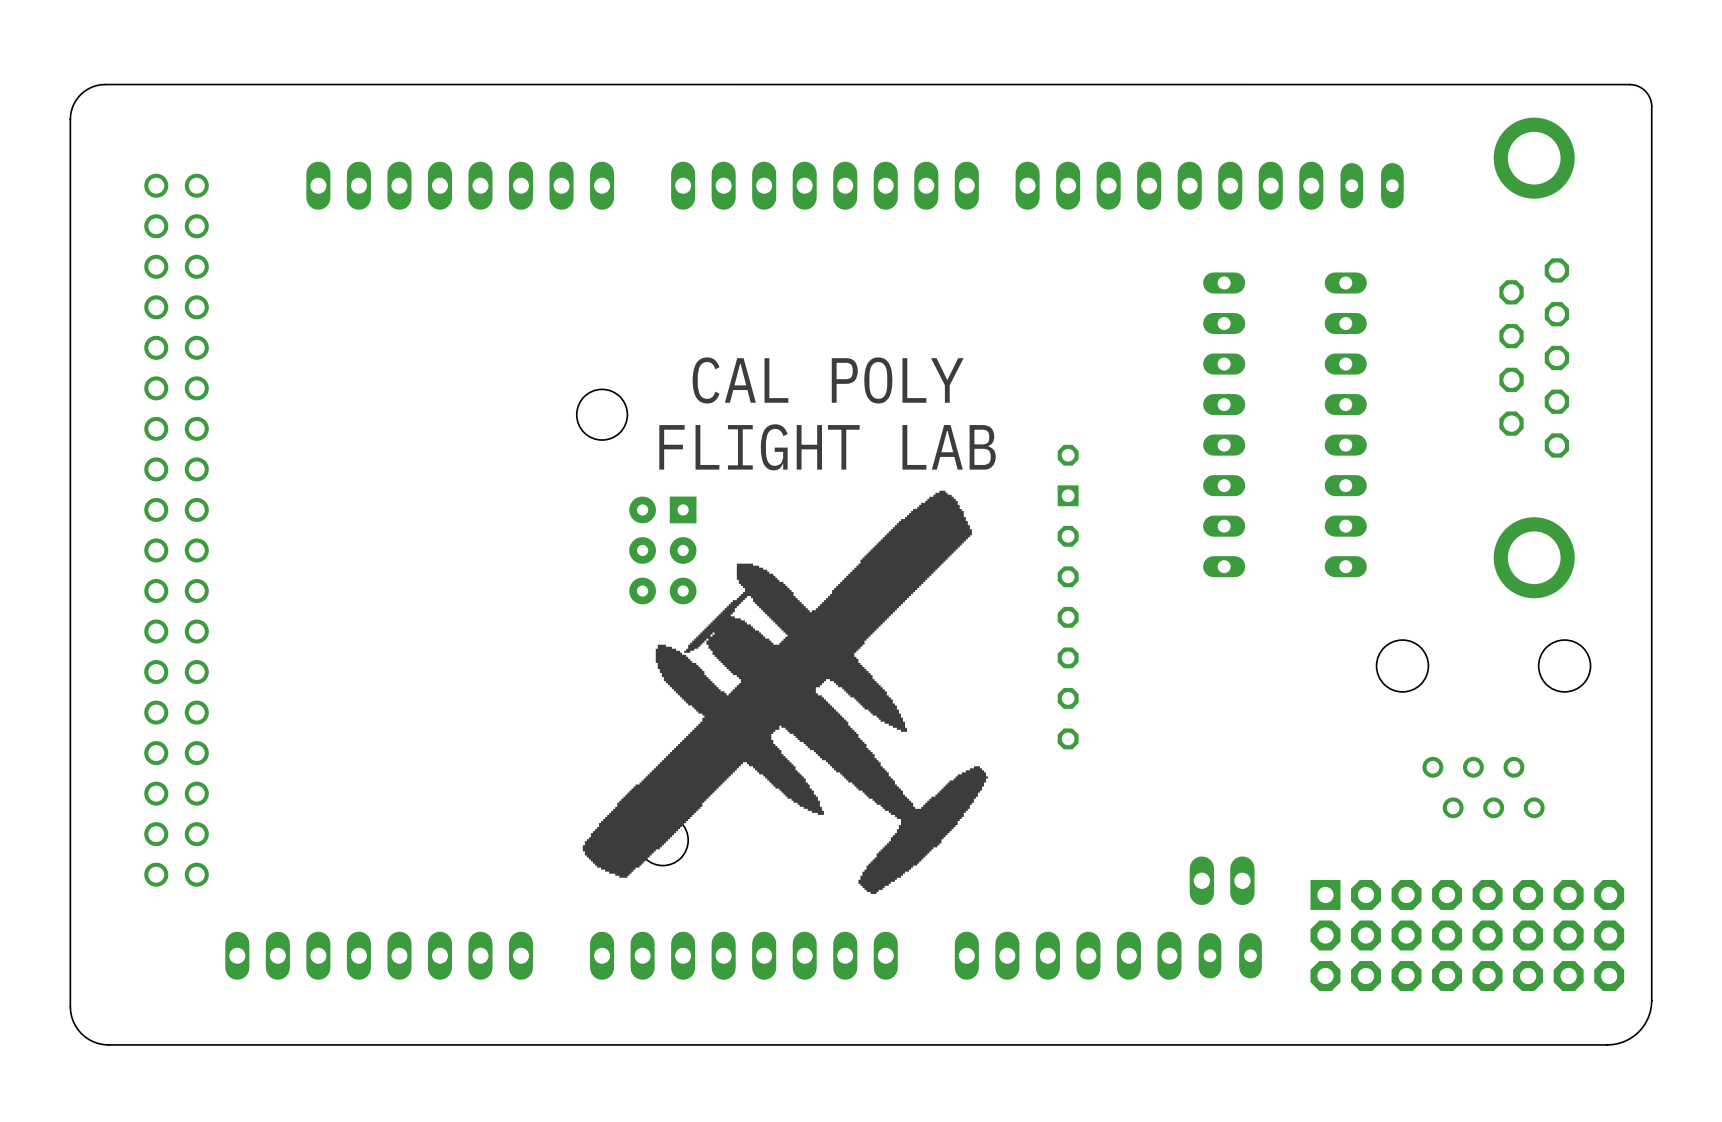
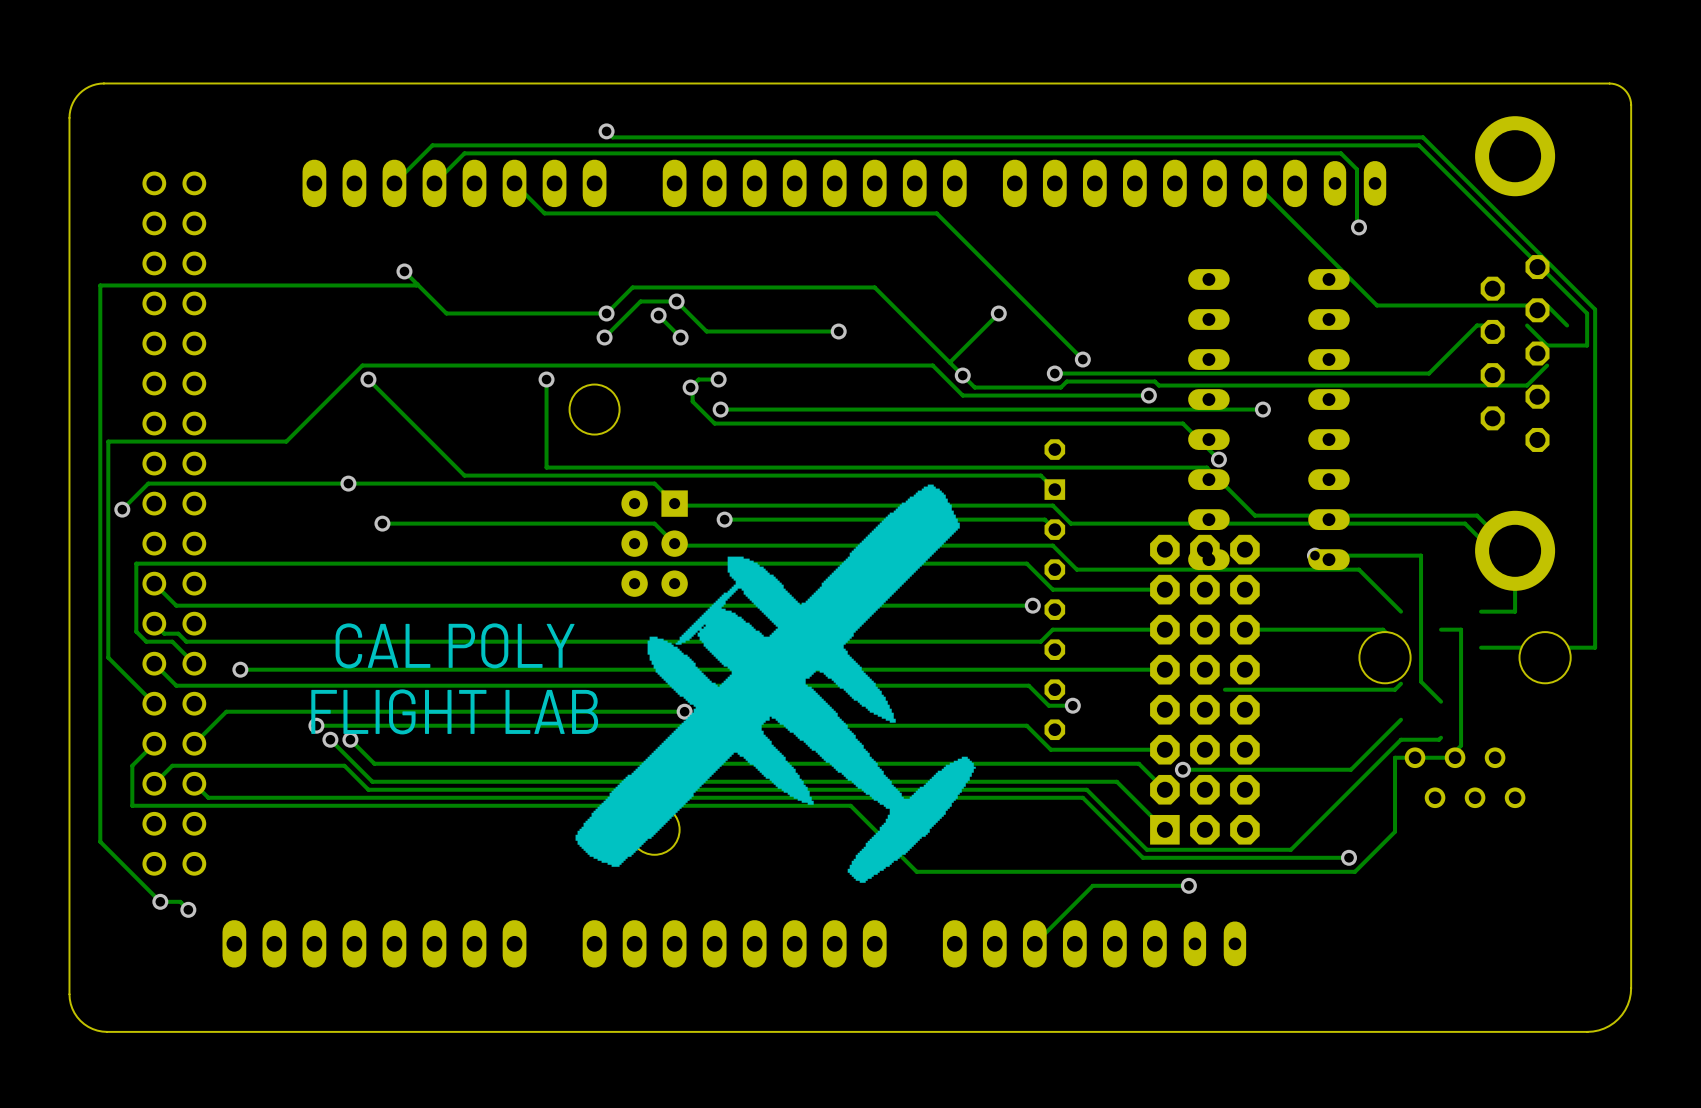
track: none -> (606, 131) (612, 137) (1423, 137) (1595, 309) (1595, 647) (1481, 647)
via: none -> (606, 131)
track: none -> (394, 183) (432, 145) (1419, 145) (1587, 313) (1587, 345) (1547, 345) (1527, 325)
track: none -> (434, 183) (464, 153) (1340, 153) (1357, 169) (1357, 227) (1359, 227)
track: none -> (514, 183) (544, 213) (936, 213) (1082, 359)
track: none -> (1254, 183) (1377, 305) (1547, 305) (1567, 325)
via: none -> (1359, 227)
track: none -> (404, 271) (446, 313) (606, 313) (632, 287) (874, 287) (974, 387) (1060, 387) (1066, 381) (1154, 381) (1158, 385) (1527, 385) (1547, 365)
via: none -> (404, 271)
track: none -> (417, 284) (100, 285) (100, 841) (160, 901) (180, 901) (188, 909)
via: none -> (676, 301)
via: none -> (606, 313)
track: none -> (998, 313) (949, 362)
via: none -> (998, 313)
track: none -> (658, 315) (680, 337)
via: none -> (658, 315)
track: none -> (1487, 325) (1477, 325) (1429, 373) (1054, 373)
track: none -> (838, 331) (706, 331) (676, 301) (640, 301) (604, 337)
via: none -> (838, 331)
via: none -> (604, 337)
via: none -> (680, 337)
via: none -> (1082, 359)
via: none -> (1054, 373)
text: CAL POLY (828, 380) -> none
via: none -> (962, 375)
track: none -> (368, 379) (464, 475) (1040, 475) (1054, 489)
via: none -> (368, 379)
track: none -> (546, 379) (546, 467) (1206, 467) (1254, 515) (1477, 515) (1515, 553) (1515, 611) (1481, 611)
via: none -> (546, 379)
track: none -> (718, 379) (698, 379) (690, 387) (692, 387) (692, 401) (714, 423) (1182, 423) (1218, 459)
via: none -> (718, 379)
via: none -> (690, 387)
track: none -> (1148, 395) (962, 395) (932, 365) (362, 365) (286, 441) (108, 441) (108, 657) (154, 703)
via: none -> (1148, 395)
via: none -> (720, 409)
track: none -> (1262, 409) (720, 409)
via: none -> (1262, 409)
text: FLIGHT LAB (827, 447) -> none
via: none -> (1218, 459)
via: none -> (348, 483)
track: none -> (122, 509) (148, 483) (654, 483) (676, 505) (1052, 505) (1070, 523) (1465, 523) (1501, 559)
via: none -> (122, 509)
track: none -> (724, 519) (1044, 519) (1054, 529)
via: none -> (724, 519)
track: none -> (382, 523) (654, 523) (676, 545) (1052, 545) (1076, 569) (1359, 569) (1401, 611)
via: none -> (382, 523)
track: none -> (1314, 555) (1421, 555) (1421, 681) (1441, 701)
via: none -> (1314, 555)
track: none -> (154, 583) (176, 605) (1032, 605)
track: none -> (1164, 589) (1052, 589) (1026, 563) (136, 563) (136, 631) (146, 641) (172, 641) (194, 663)
via: none -> (1032, 605)
track: none -> (154, 623) (164, 633) (178, 633) (186, 641) (1040, 641) (1052, 629) (1164, 629)
track: none -> (1244, 629) (1383, 629) (1401, 647)
track: none -> (1441, 629) (1461, 629) (1461, 745) (1449, 757) (1395, 757) (1395, 831) (1355, 871) (916, 871) (850, 805) (132, 805) (132, 765) (154, 743)
text: none -> CAL POLY (455, 645)
track: none -> (154, 663) (176, 685) (1028, 685) (1048, 705) (1072, 705)
via: none -> (240, 669)
track: none -> (1164, 669) (240, 669)
track: none -> (1401, 683) (1395, 689) (1224, 689)
via: none -> (1072, 705)
text: none -> FLIGHT LAB (454, 711)
track: none -> (684, 711) (226, 711) (194, 743)
via: none -> (684, 711)
track: none -> (1401, 719) (1351, 769) (1182, 769)
track: none -> (316, 725) (1026, 725) (1050, 749) (1164, 749)
via: none -> (316, 725)
track: none -> (1441, 737) (1439, 739) (1401, 739) (1290, 849) (1146, 849) (1086, 789) (368, 789) (344, 765) (172, 765) (154, 783)
track: none -> (330, 739) (372, 781) (1116, 781) (1164, 829)
via: none -> (330, 739)
track: none -> (350, 739) (374, 763) (1138, 763) (1164, 789)
via: none -> (350, 739)
via: none -> (1182, 769)
track: none -> (194, 783) (208, 797) (1082, 797) (1142, 857) (1348, 857)
via: none -> (1348, 857)
part: (1222, 880) -> none
track: none -> (1188, 885) (1092, 885) (1034, 943)
via: none -> (1188, 885)
via: none -> (160, 901)
via: none -> (188, 909)
part rotation: 0° (1467, 935) -> 90° counterclockwise (1204, 689)
part position: (1467, 935) -> (1204, 689)

